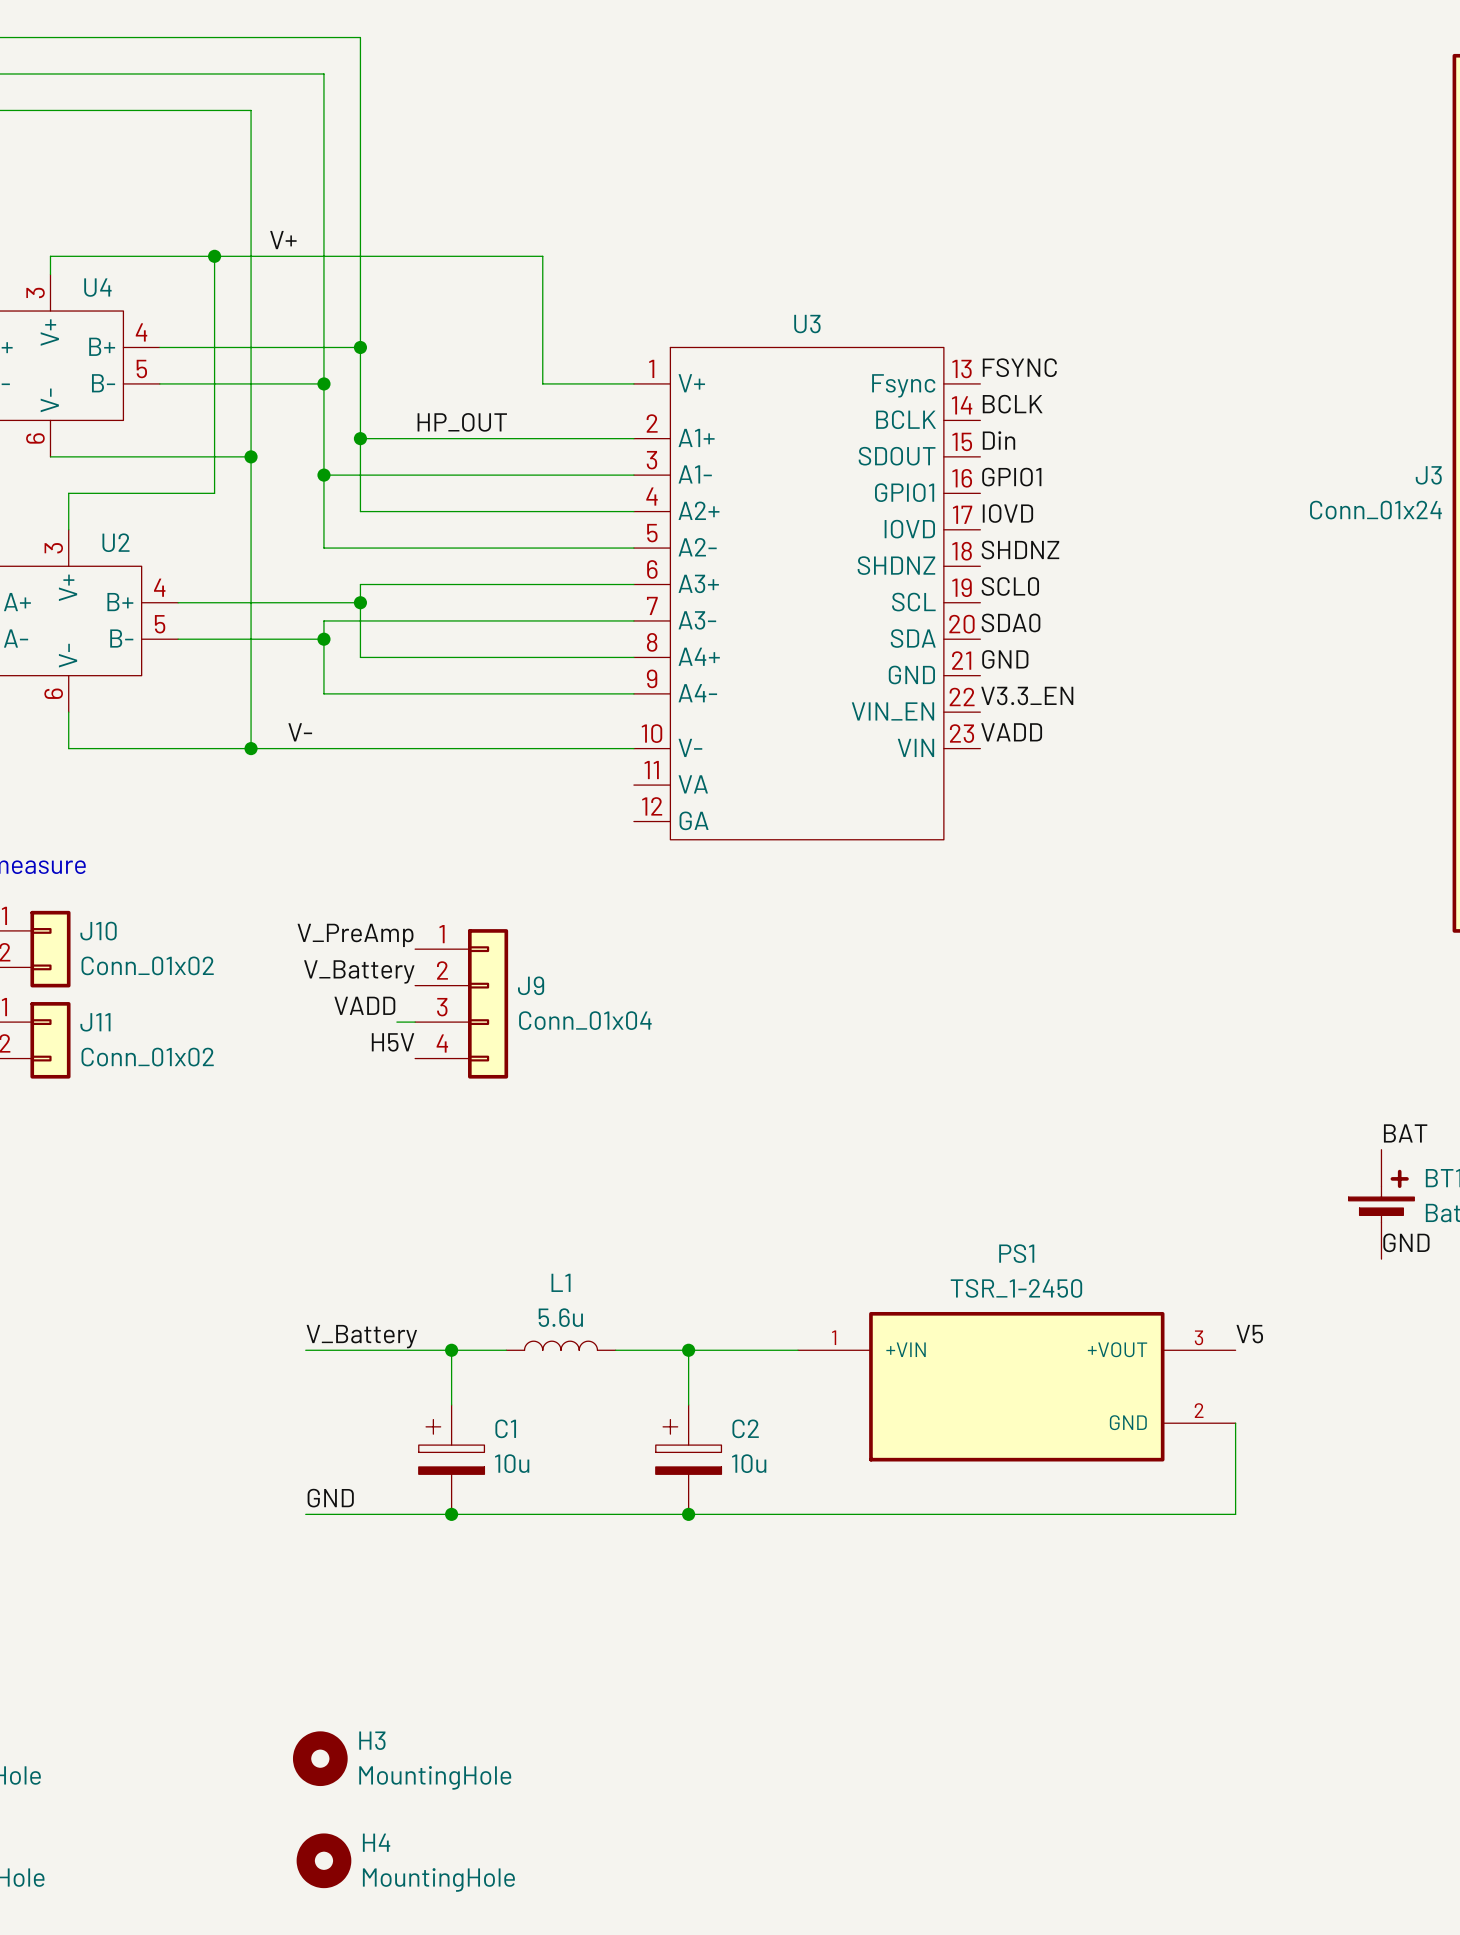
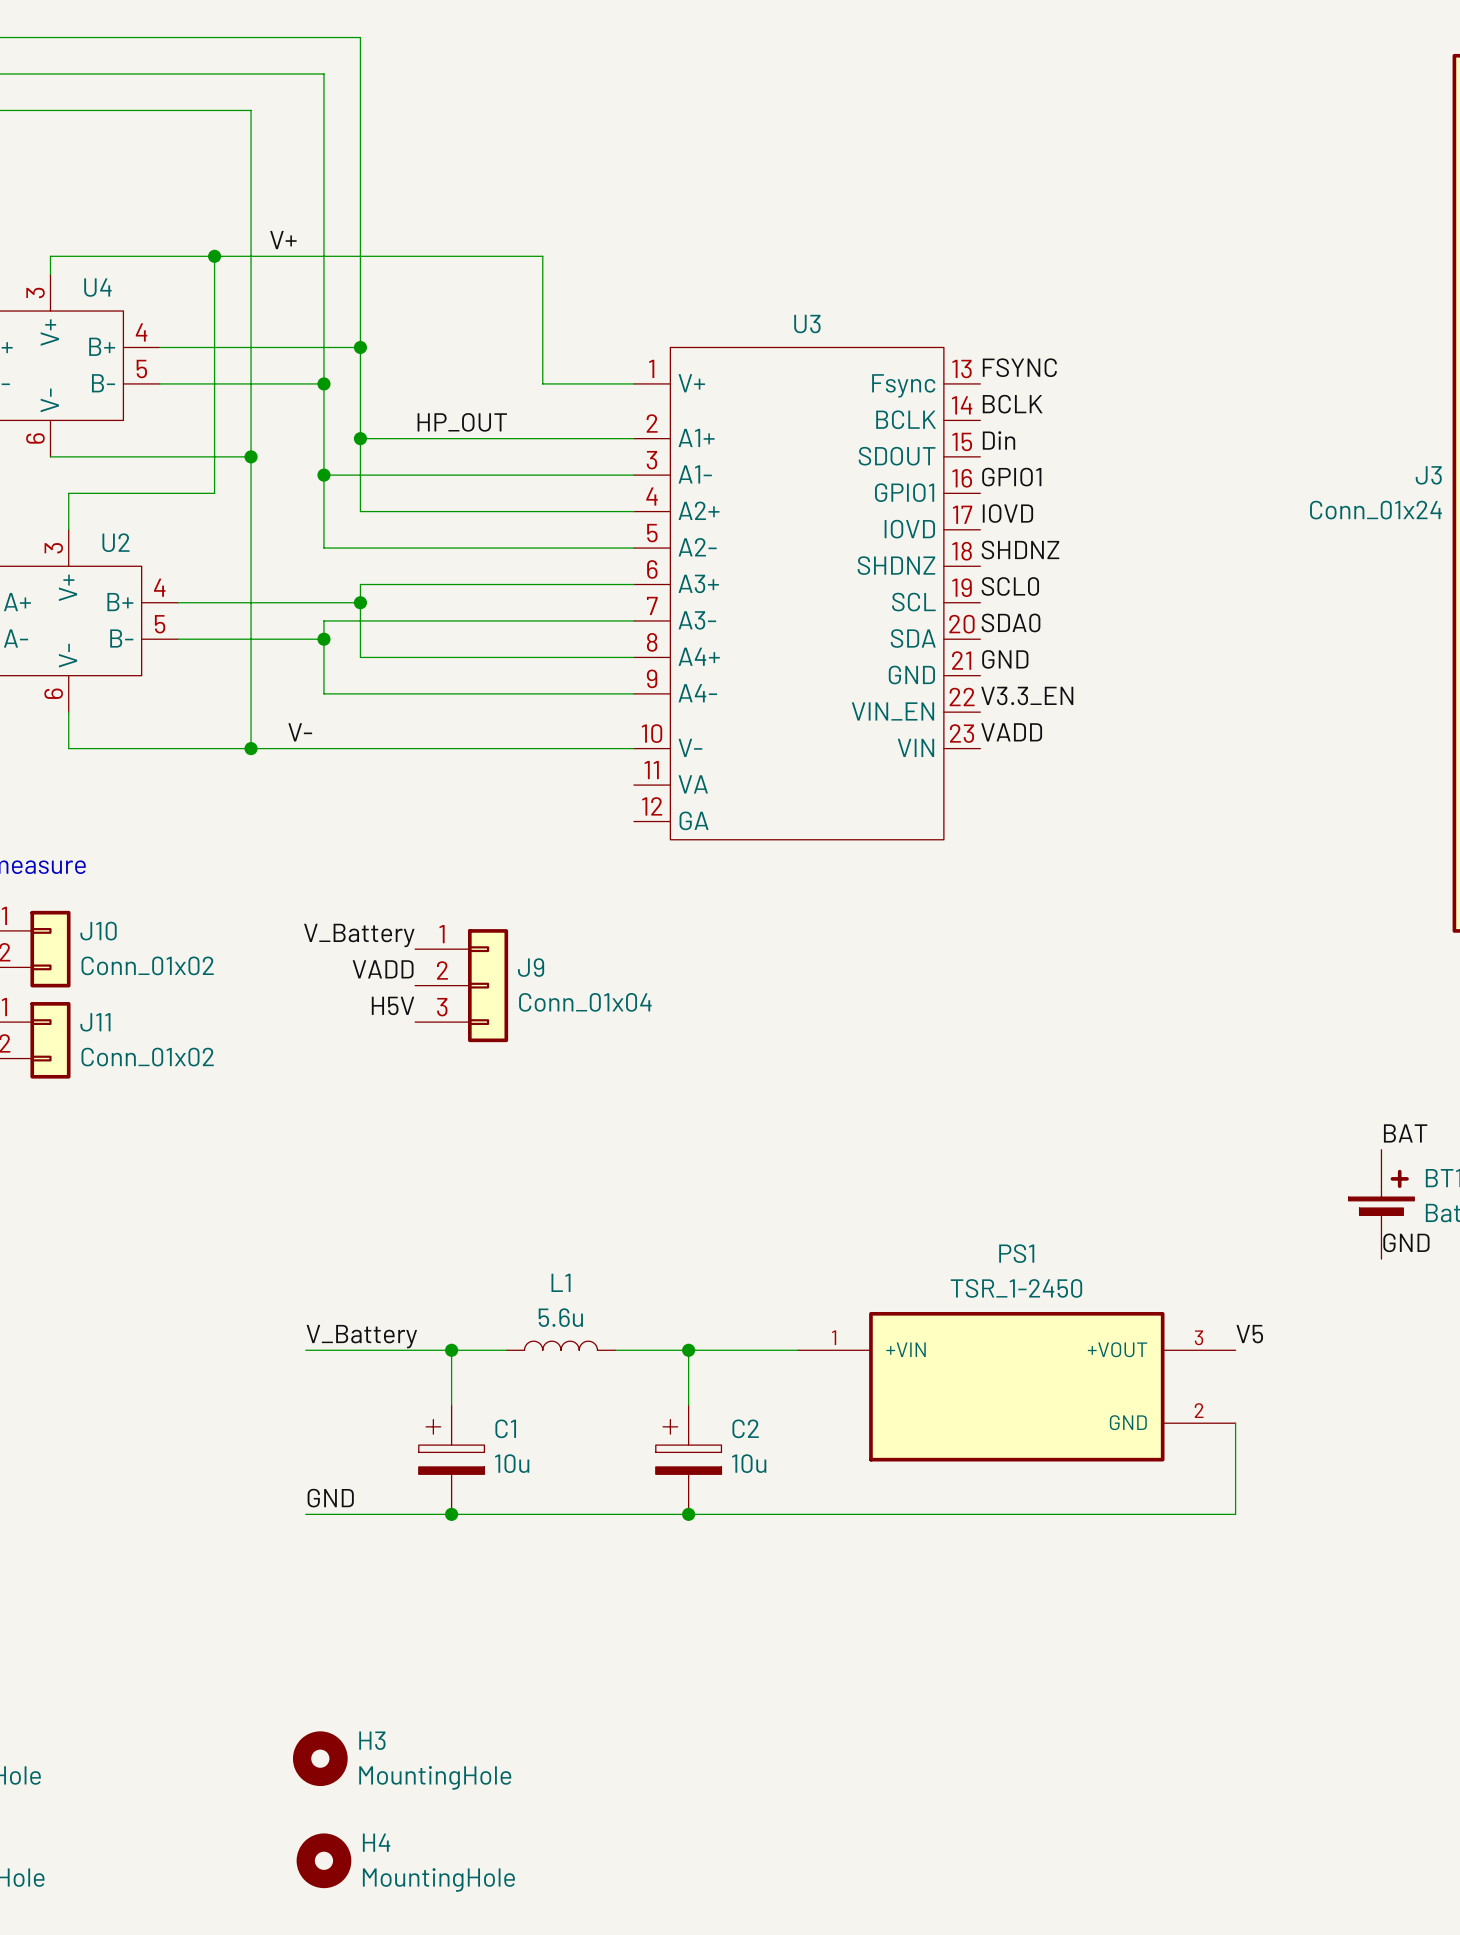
J9 symbol: [415, 929, 509, 1079] -> [415, 929, 509, 1043]
label: V_PreAmp (355, 935) -> V_Battery (359, 935)
label: V_Battery (359, 971) -> VADD (383, 969)
label: VADD (364, 1005) -> none
wire: (396, 1022) (415, 1022) -> none
label position: H5V (393, 1042) -> H5V (393, 1005)

